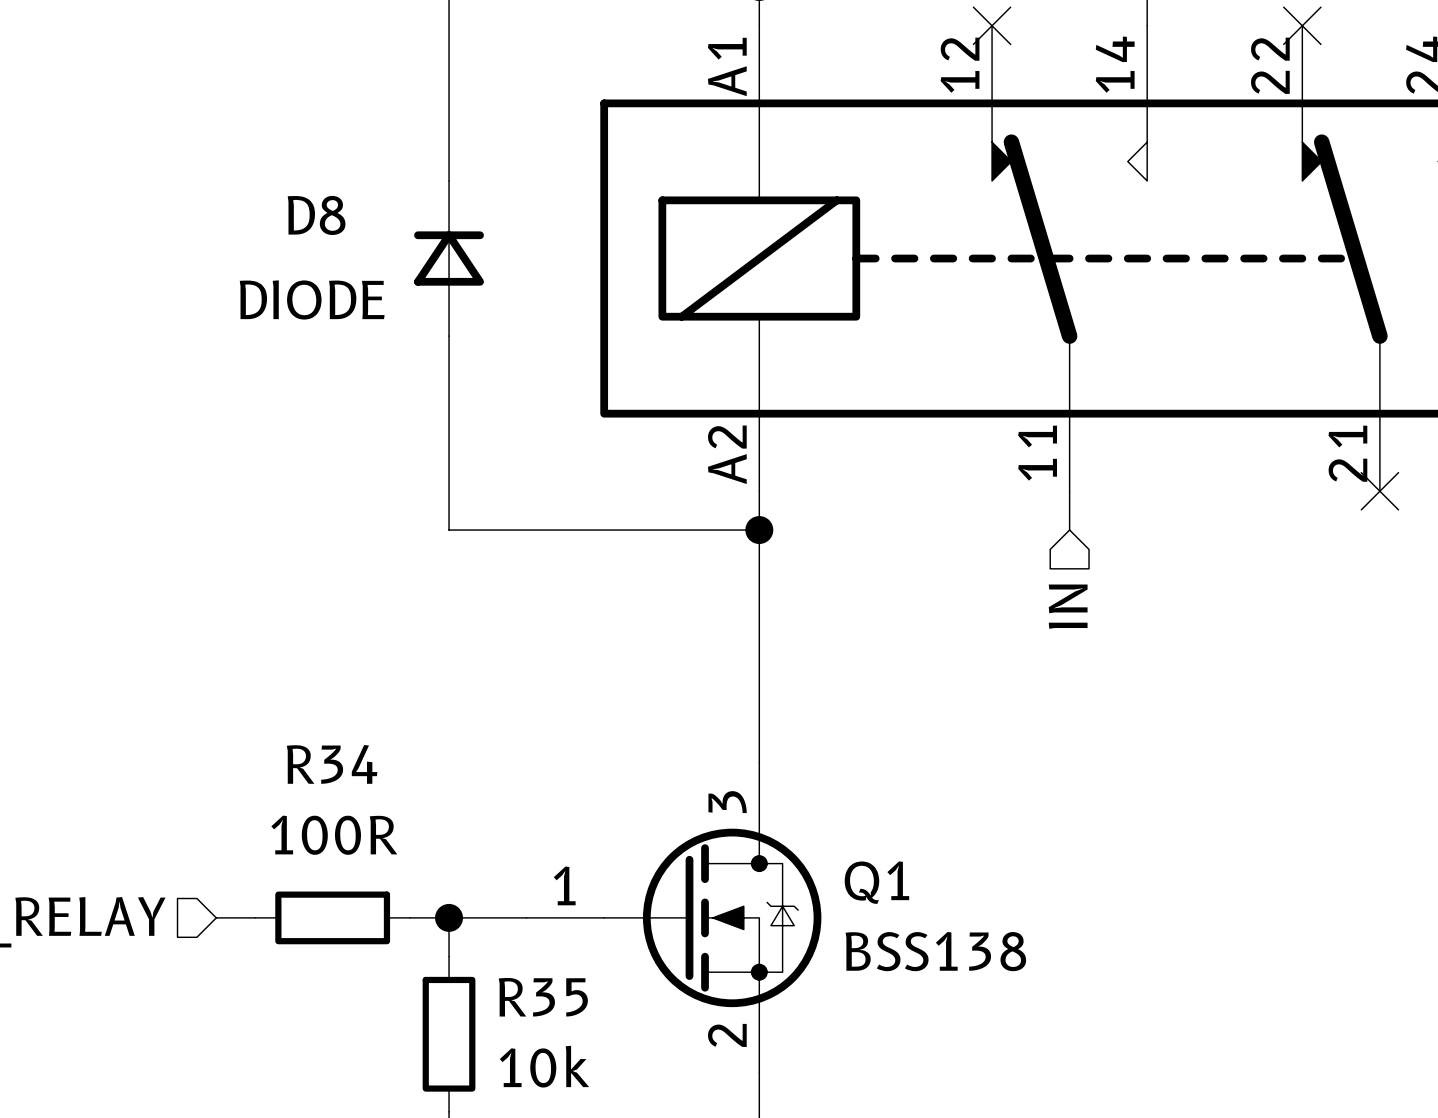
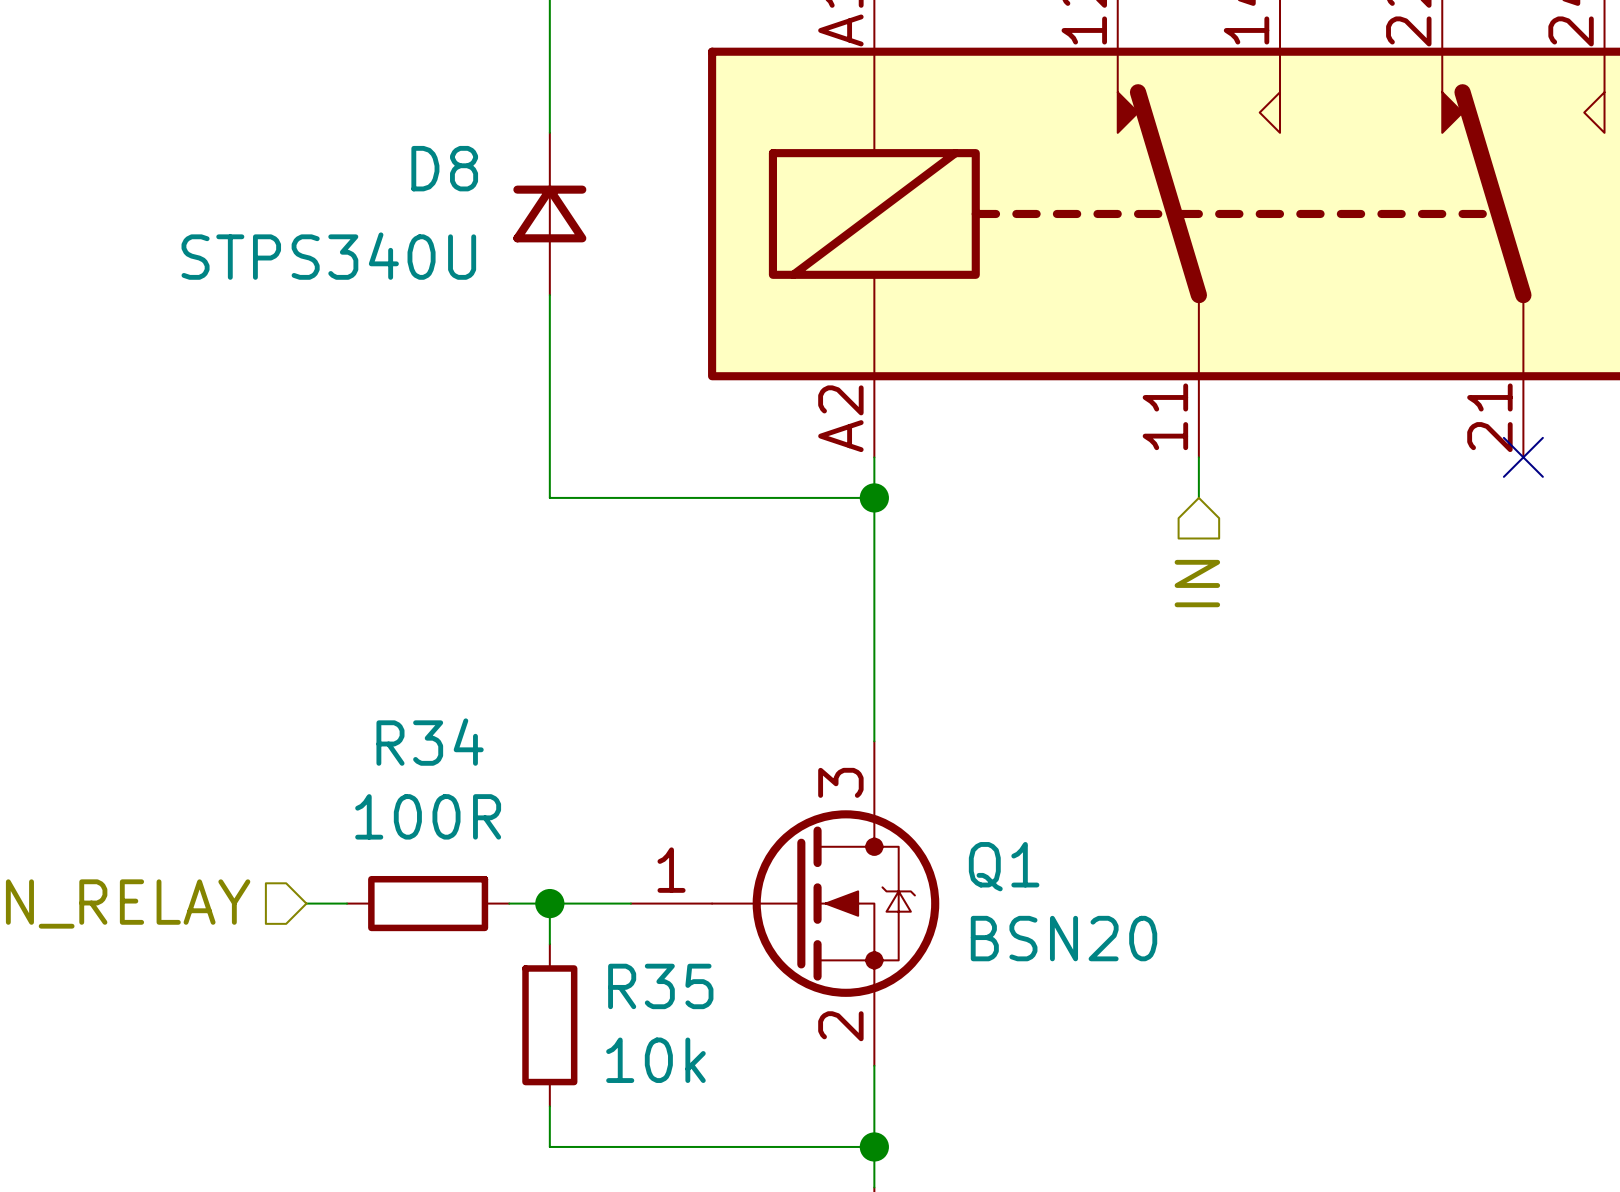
D8 name position: D8 (316, 215) -> D8 (444, 168)
D8 value: DIODE (312, 299) -> STPS340U (328, 256)
Q1 value: BSS138 (935, 951) -> BSN20 (1064, 938)

